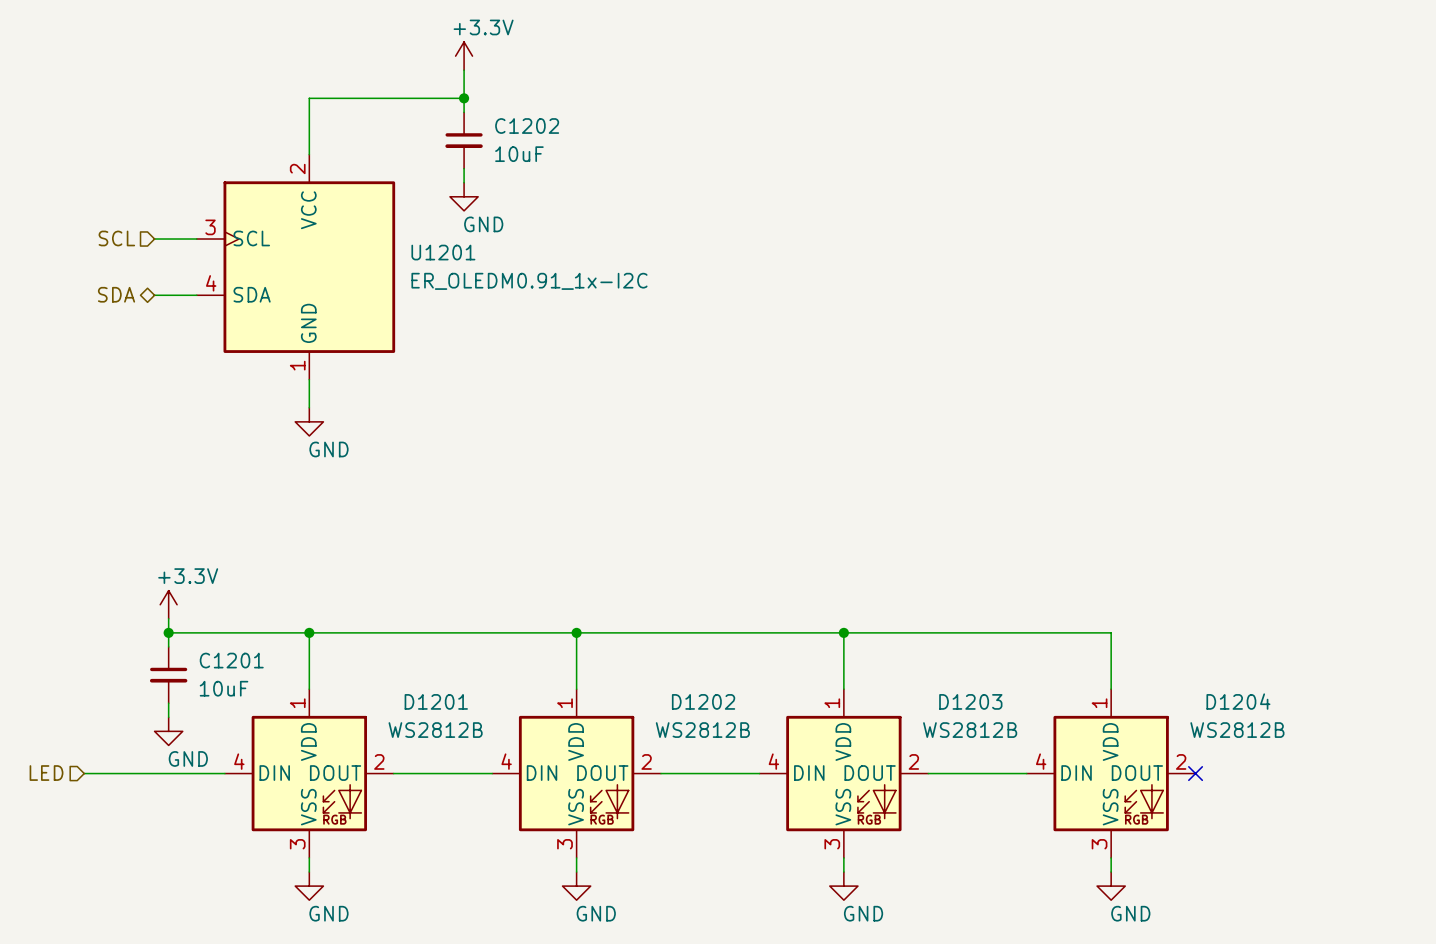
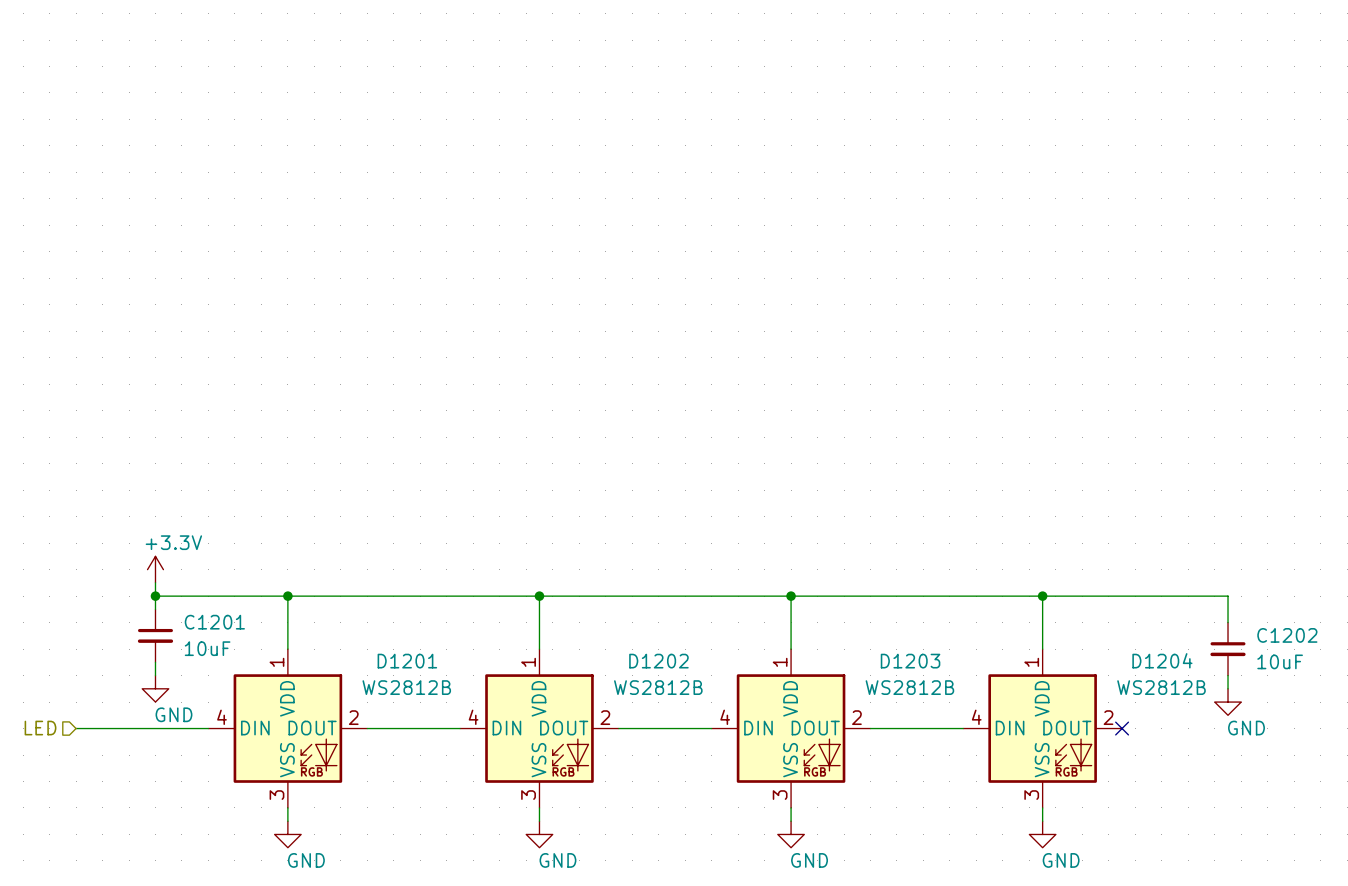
power symbol: +3.3V (464, 56) -> none
wire: (464, 70) (464, 112) -> none
wire: (464, 98) (309, 98) (309, 154) -> none
junction: (464, 98) -> none
C1202 position: (464, 140) -> (1228, 649)
wire: (464, 168) (464, 182) -> none
power symbol: GND (464, 196) -> none
hierarchical label: SCL (116, 238) -> none
wire: (154, 239) (196, 239) -> none
U1201: ER_OLEDM0.91_1x-I2C (295, 267) -> none
hierarchical label: SDA (116, 294) -> none
wire: (154, 295) (196, 295) -> none
wire: (309, 379) (309, 407) -> none
power symbol: GND (309, 421) -> none
wire: none -> (1042, 596) (1228, 596) (1228, 622)
junction: none -> (1042, 596)
wire: none -> (1228, 675) (1228, 688)
power symbol: none -> GND (1228, 702)

